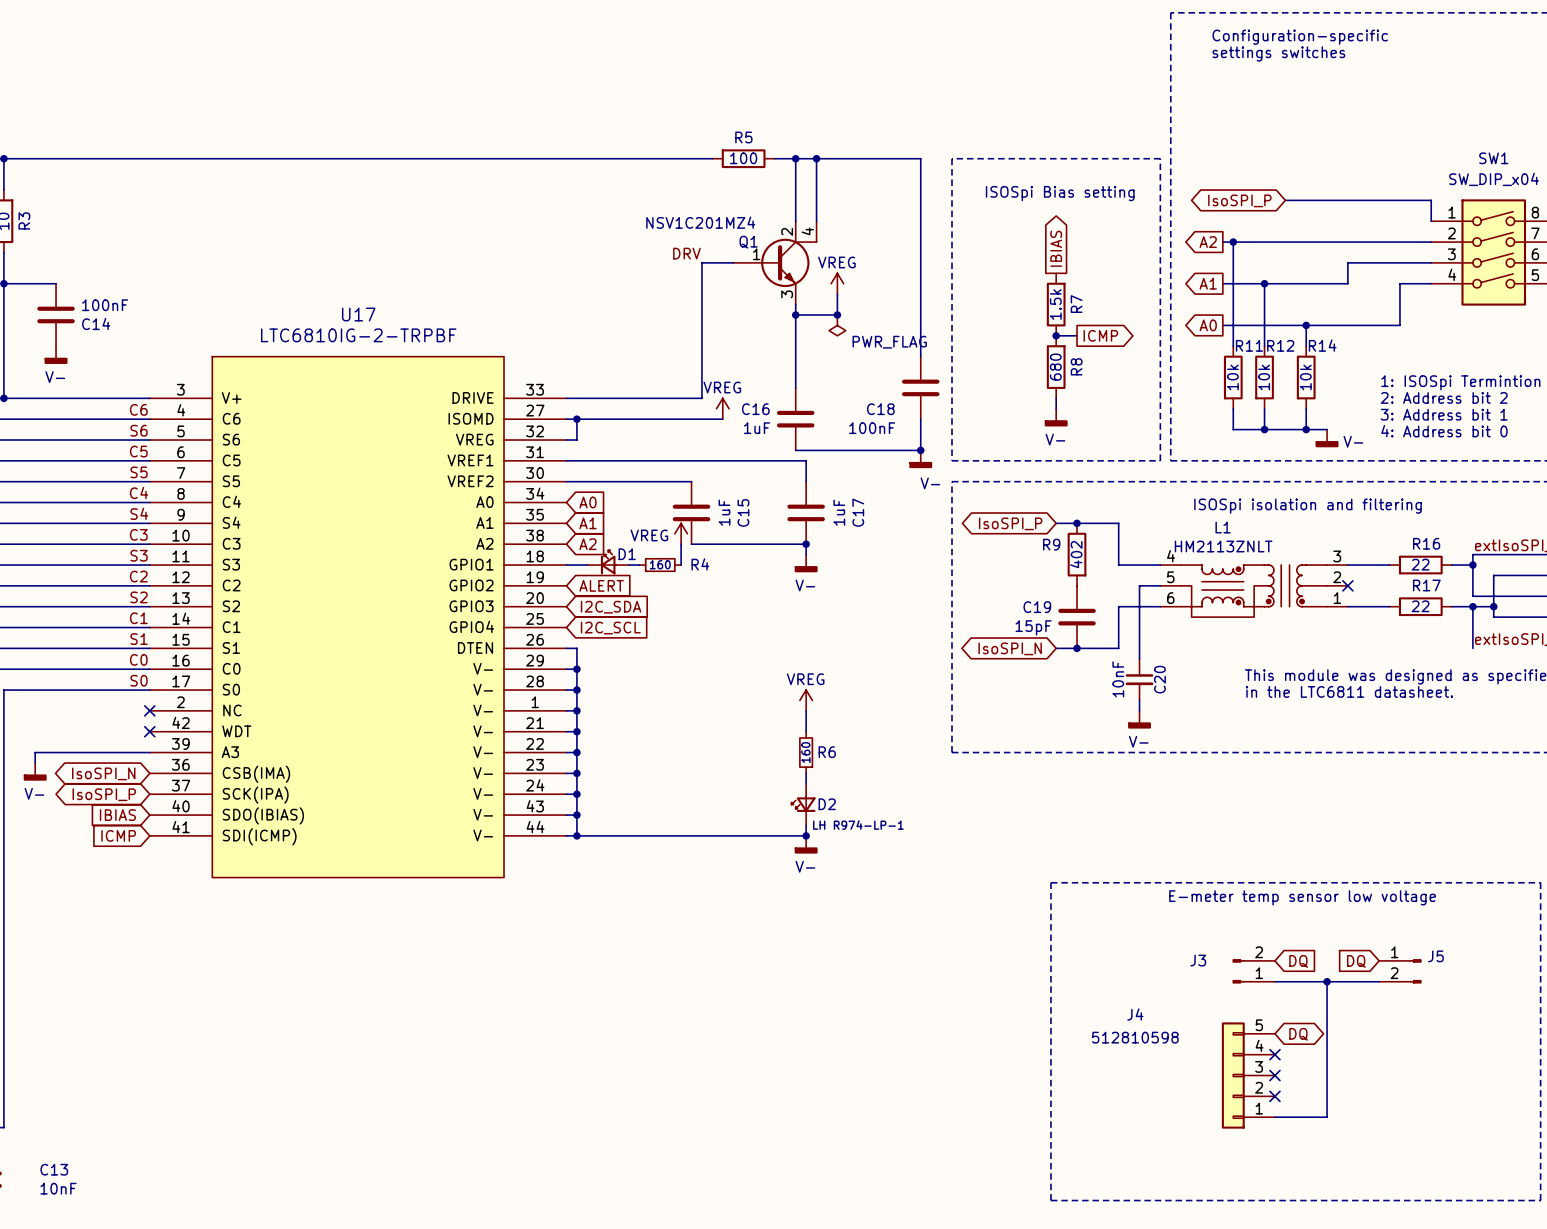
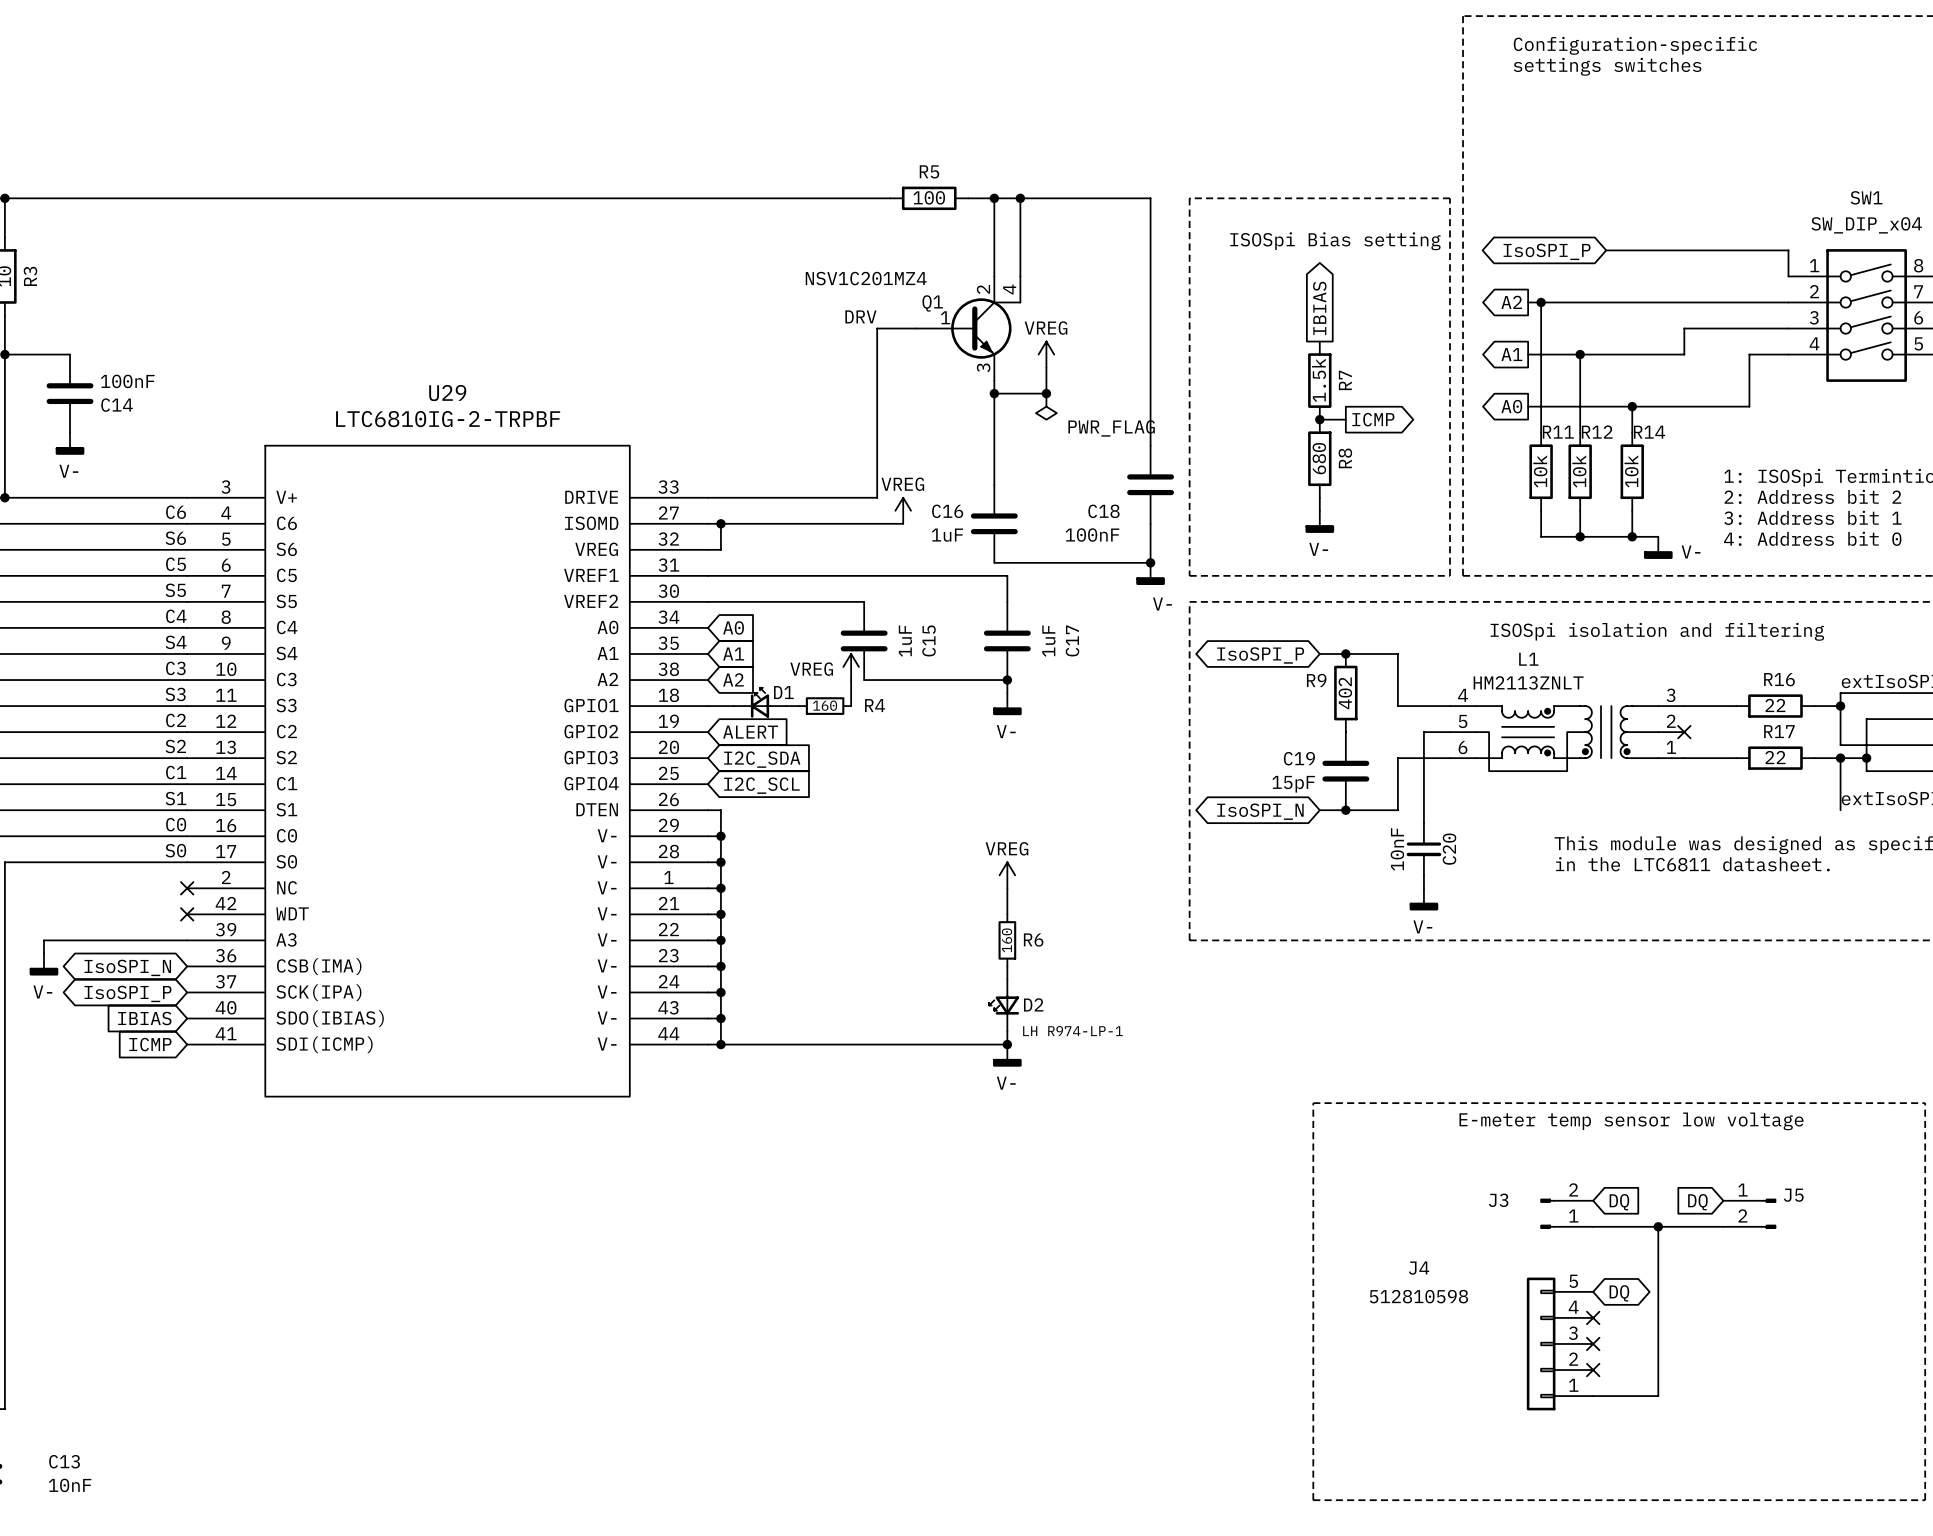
U17 name: U17 (358, 314) -> U29 (447, 393)

